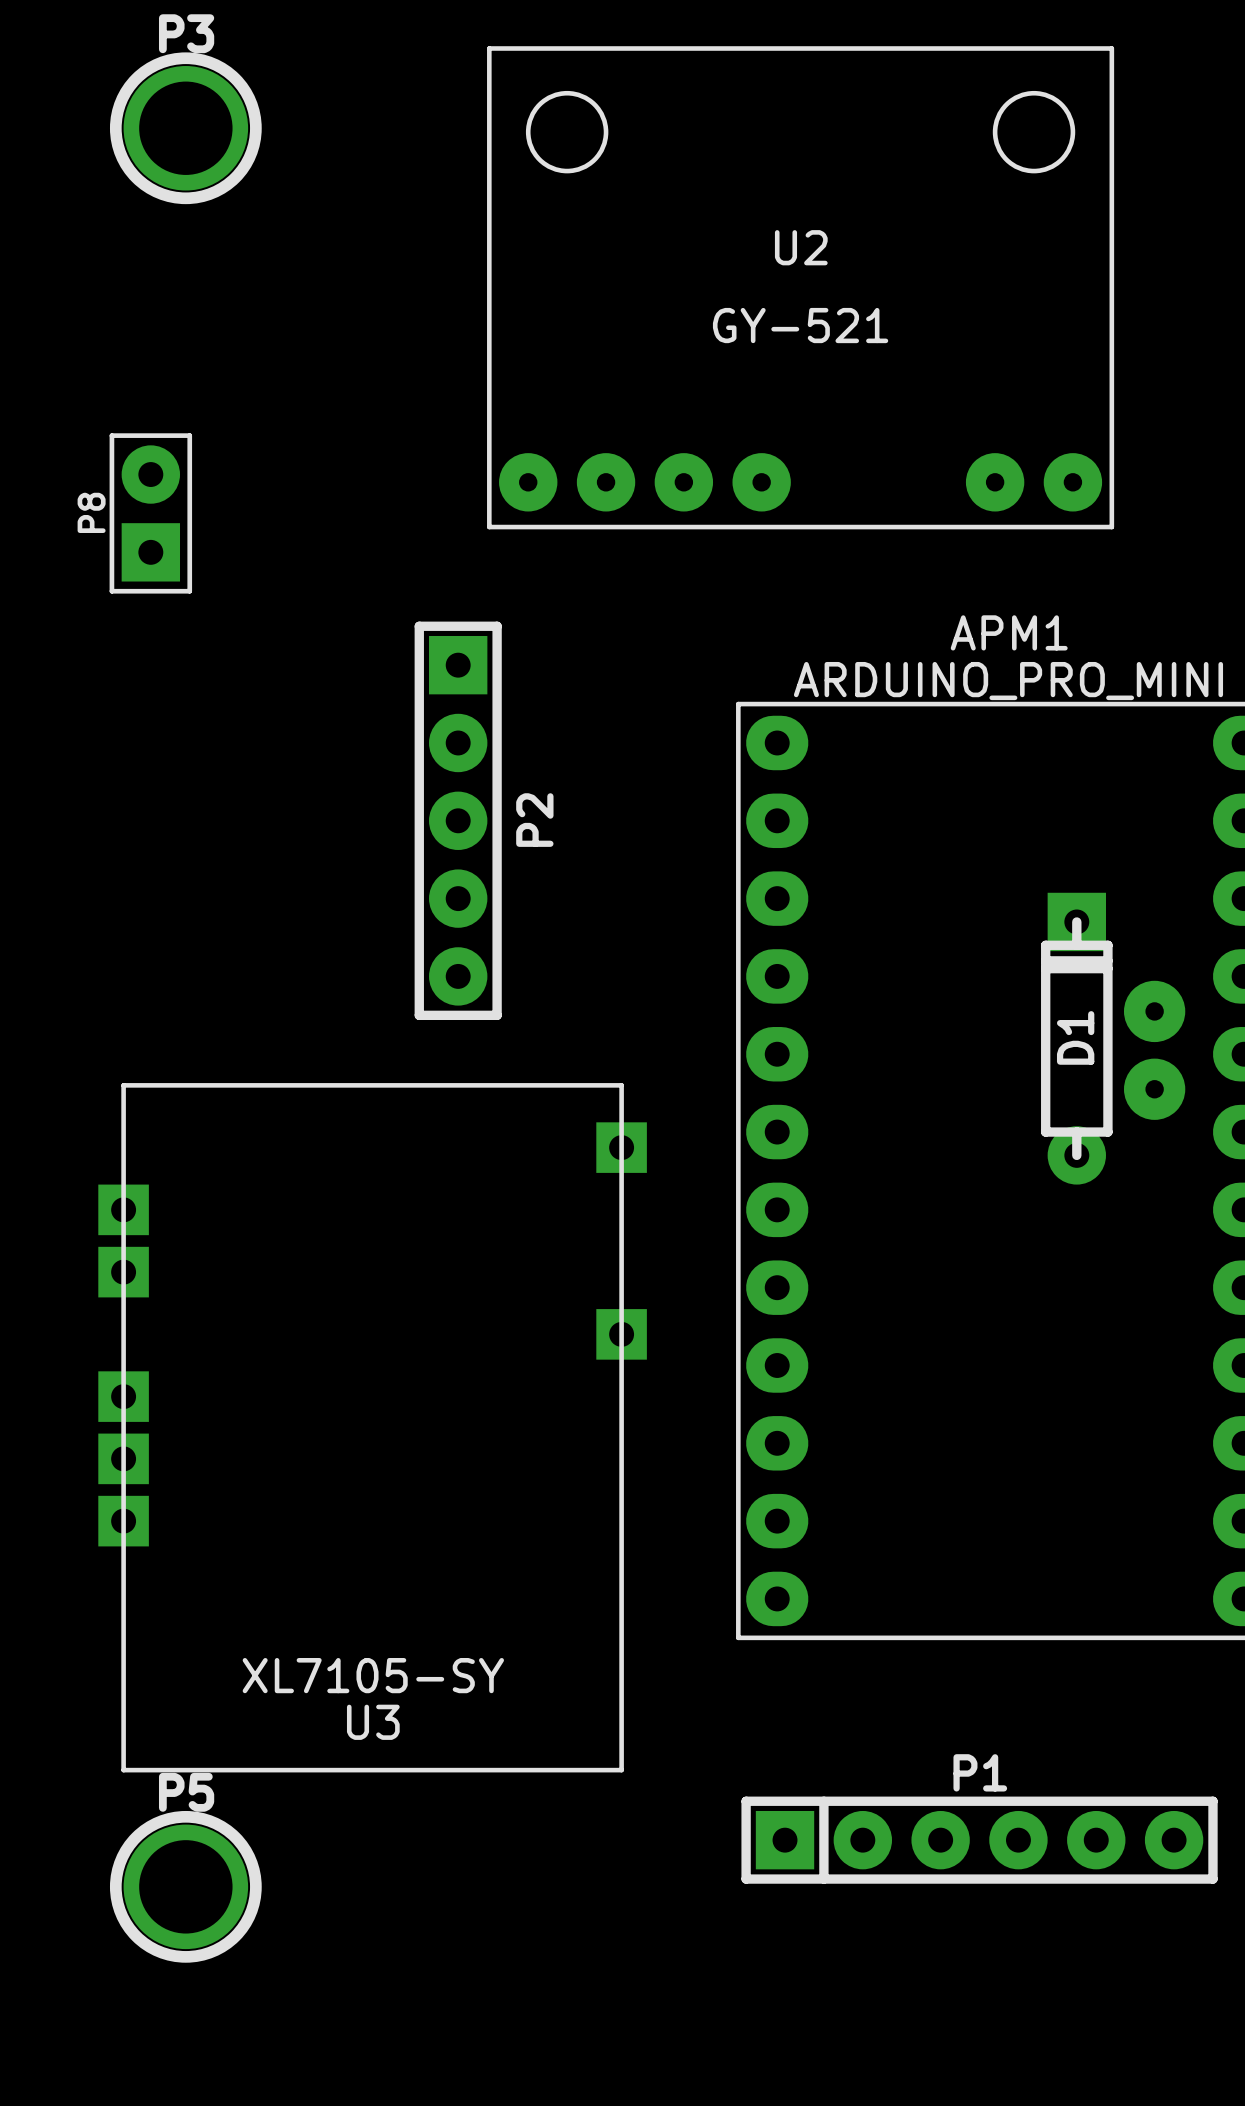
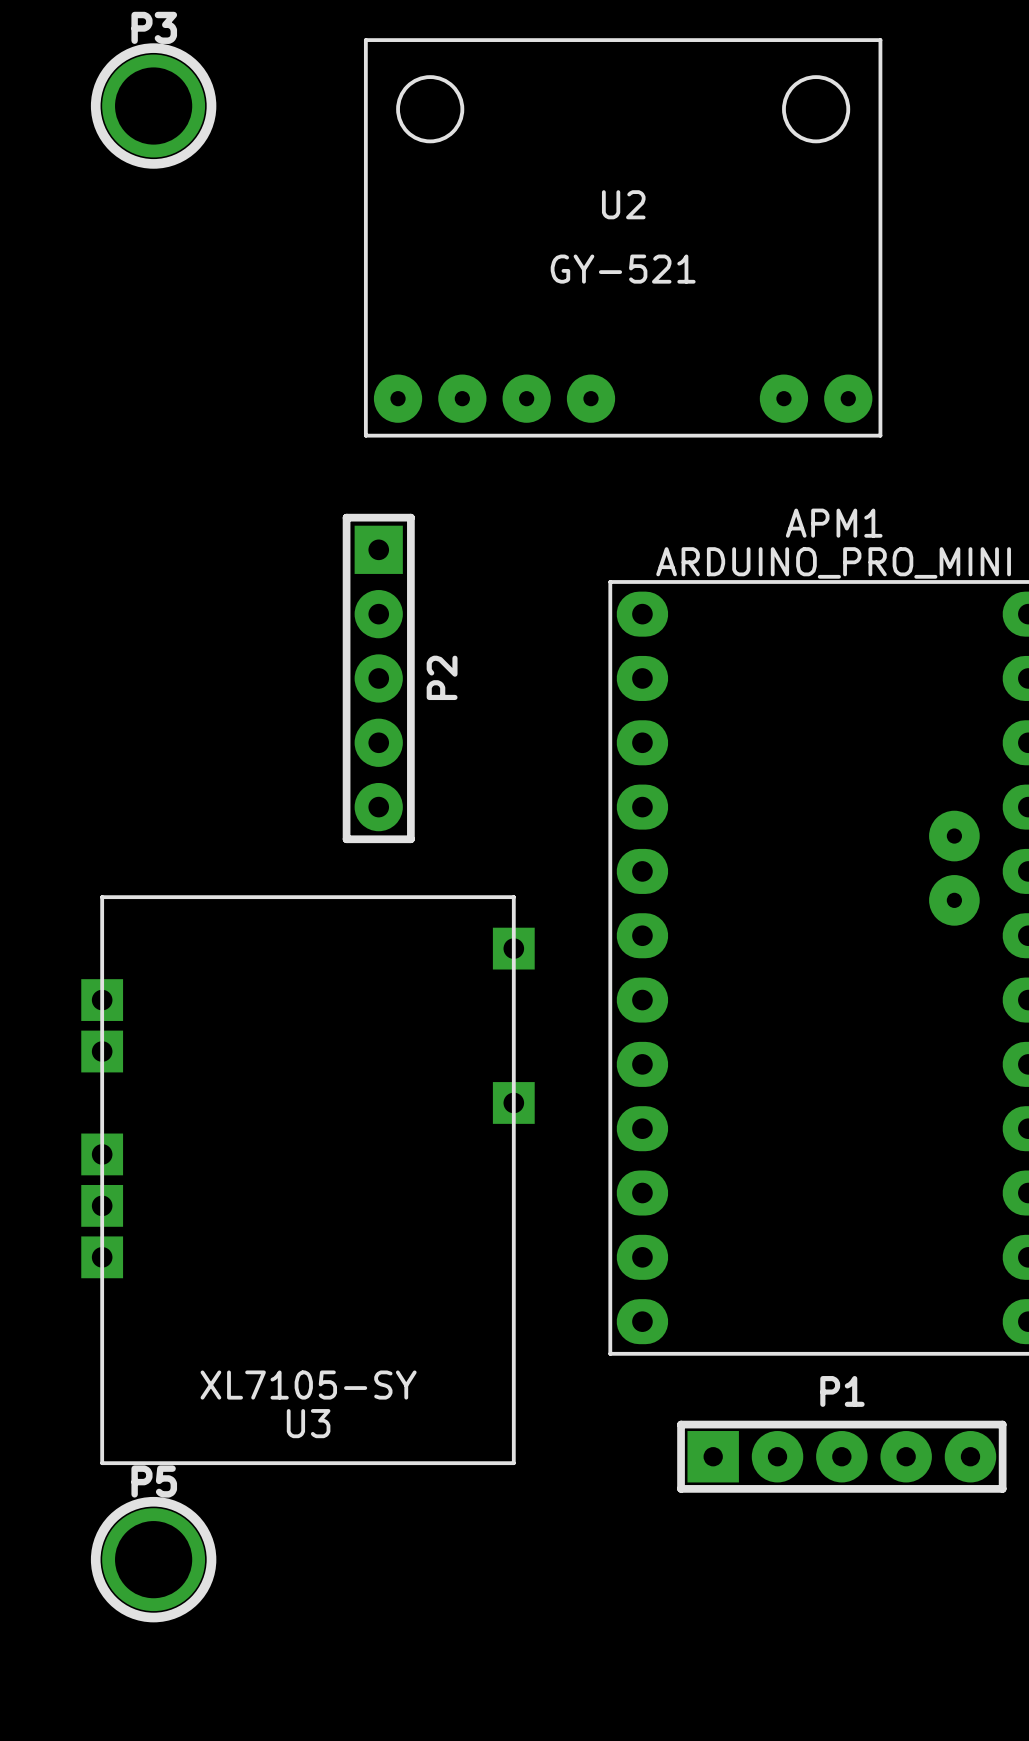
U2 position: (800, 287) -> (623, 237)
P8: (150, 513) -> none
D1: (1076, 1038) -> none
P1 footprint: [741, 1796, 1218, 1884] -> [677, 1420, 1007, 1493]

